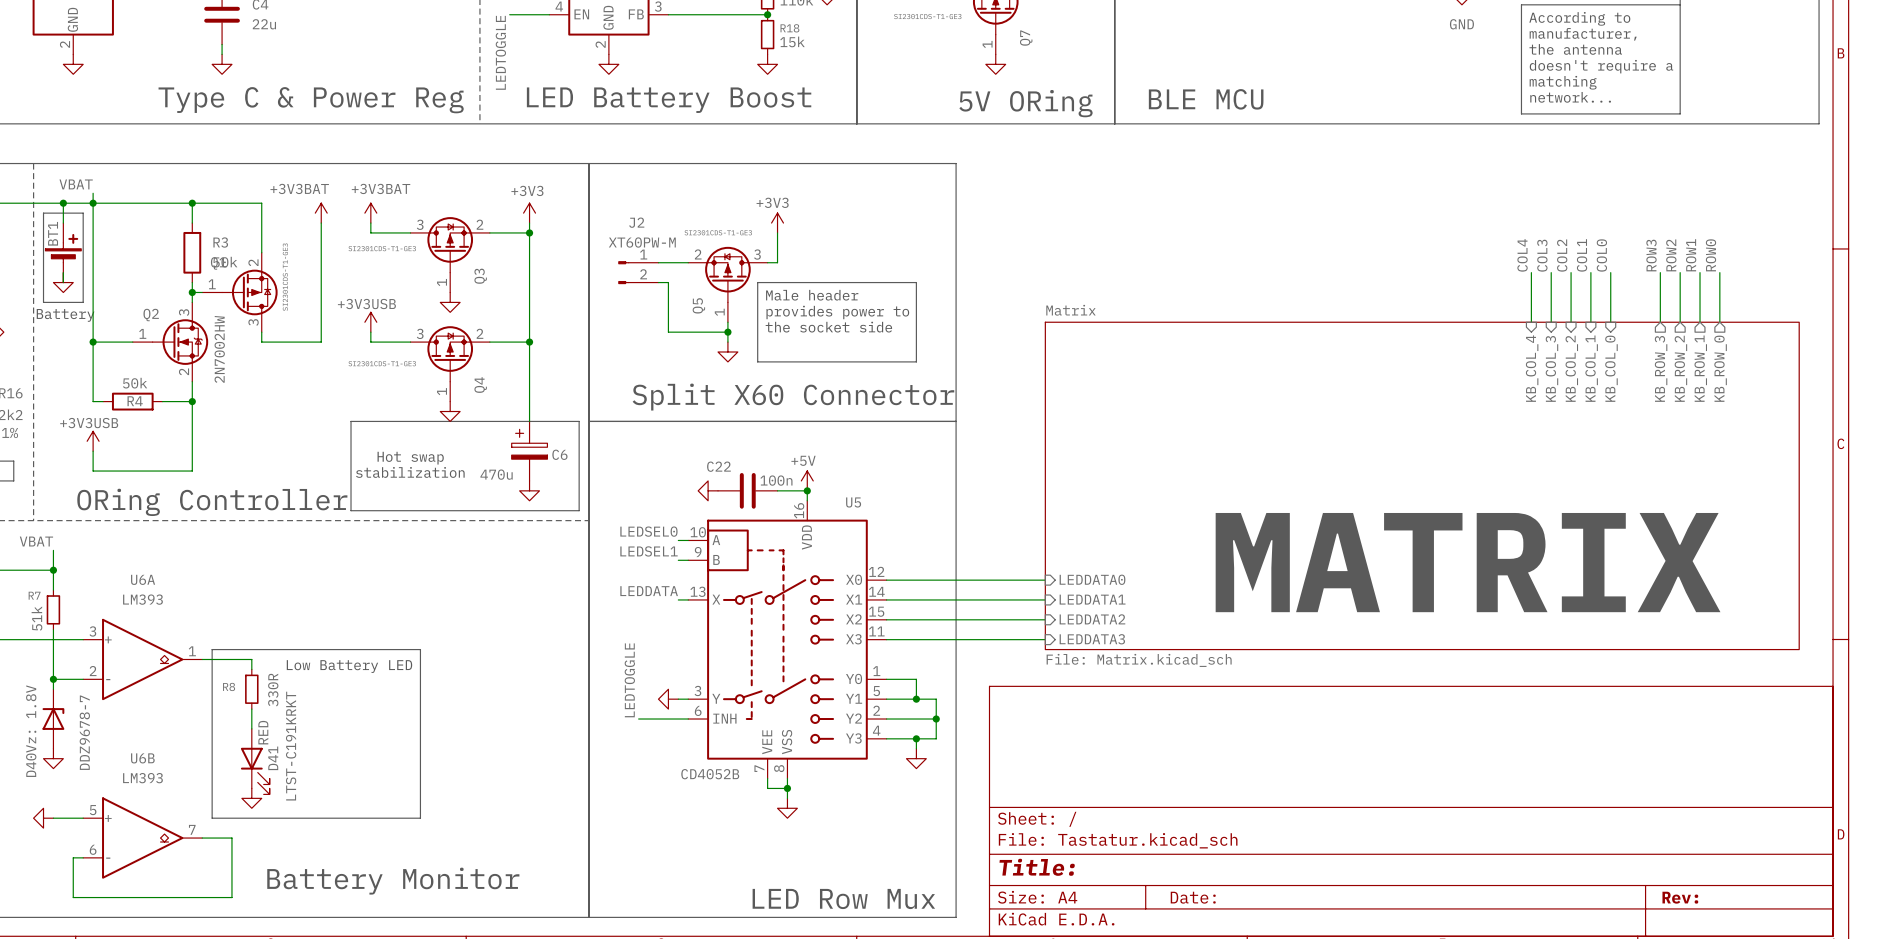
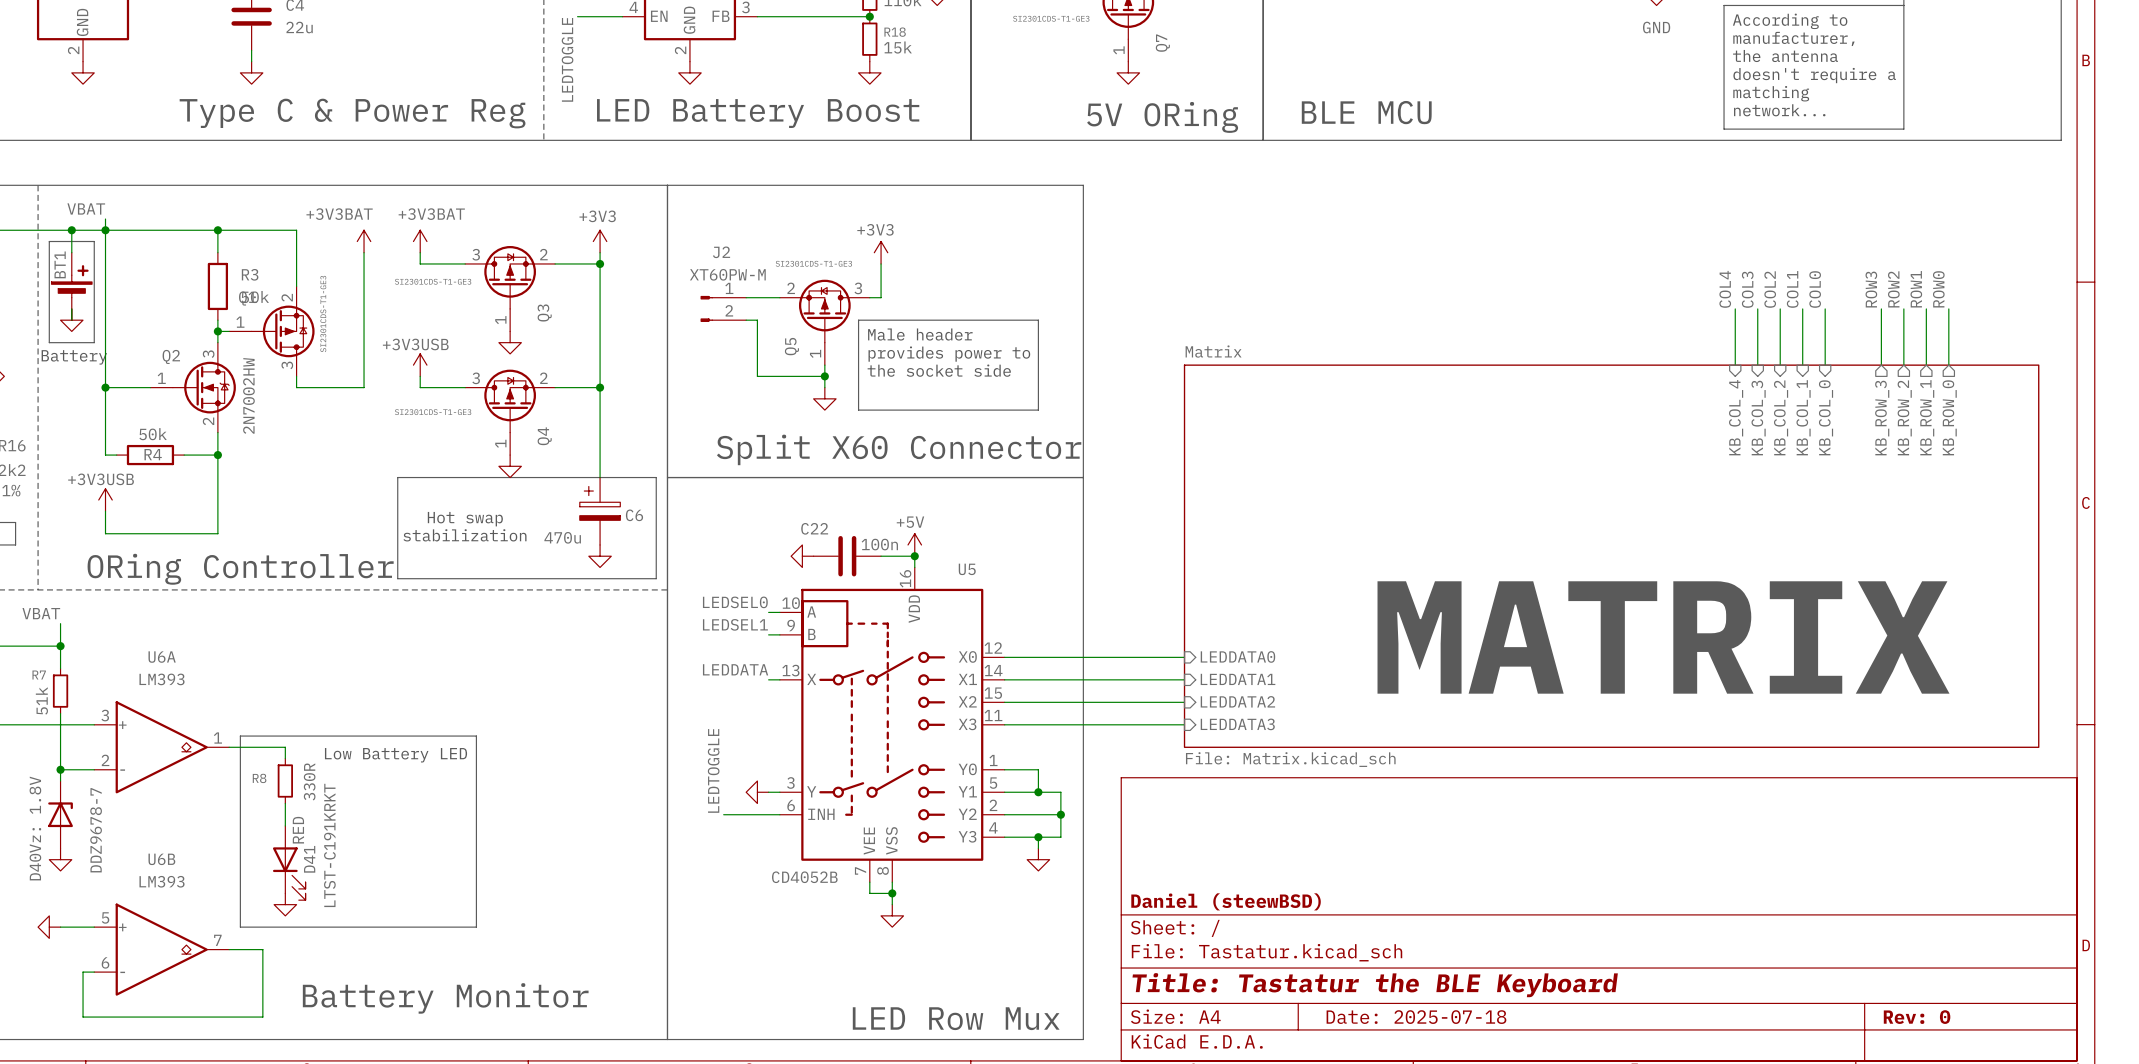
sheet Matrix shape: [1044, 321, 1800, 651] -> [1183, 364, 2040, 748]
title block: none -> Daniel (steewBSD) (1226, 901)
title block: Title: (1037, 867) -> Title: Tastatur the BLE Keyboard (1375, 985)
title block: Date: (1193, 897) -> Date: 2025-07-18 (1416, 1017)
title block: Rev: (1680, 897) -> Rev: 0 (1917, 1017)

